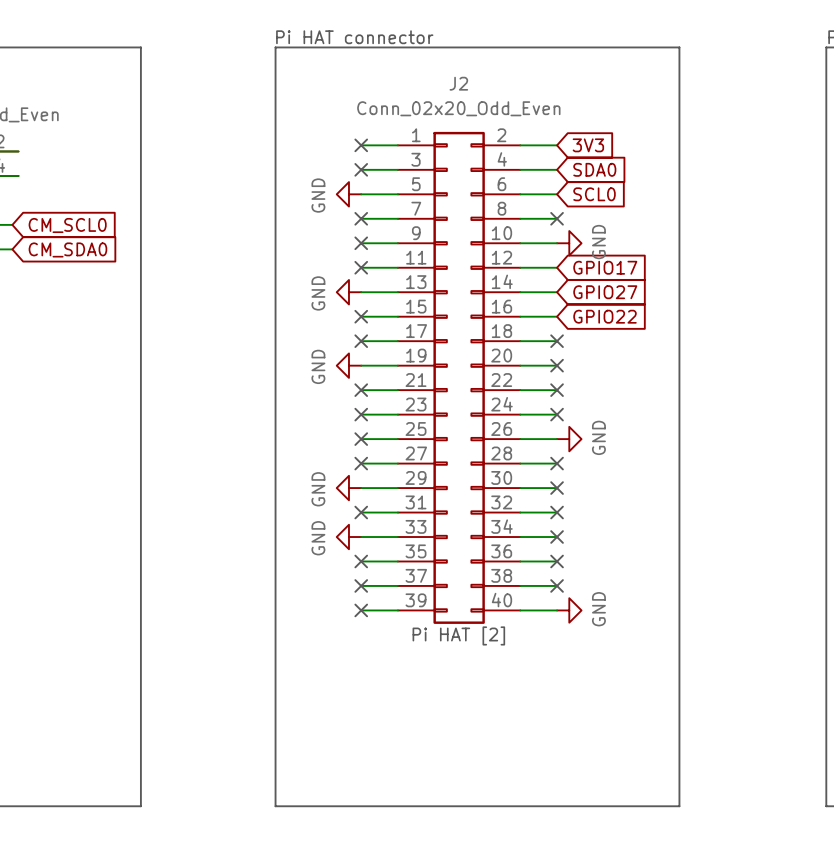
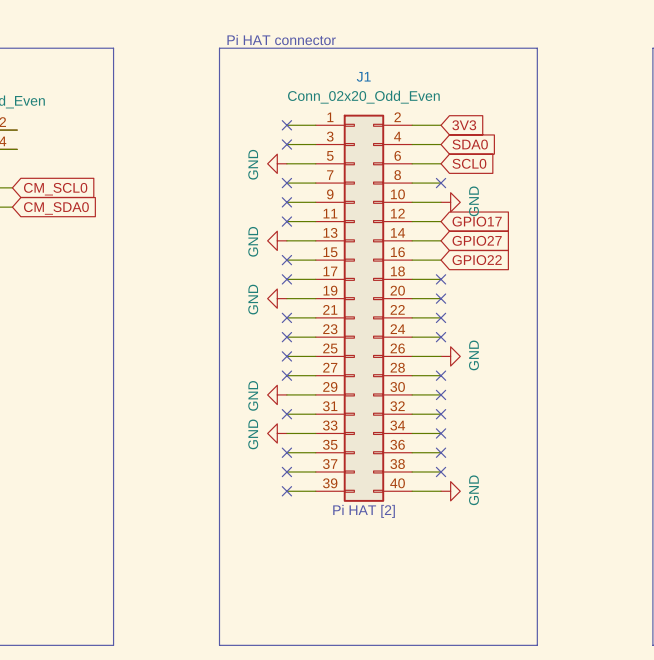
J2 name: J2 (458, 83) -> J1 (363, 76)

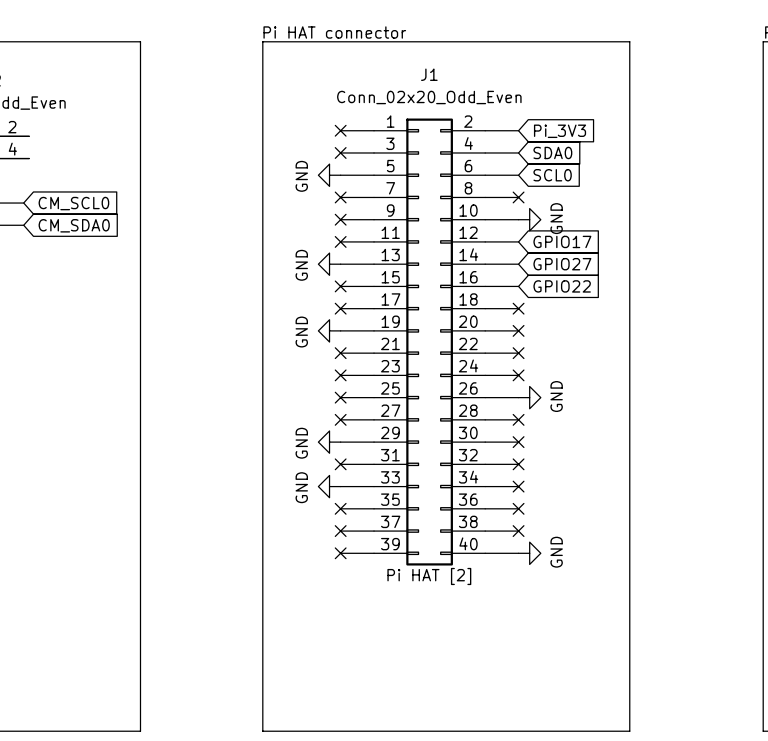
global label: 3V3 (464, 125) -> Pi_3V3 (560, 131)

